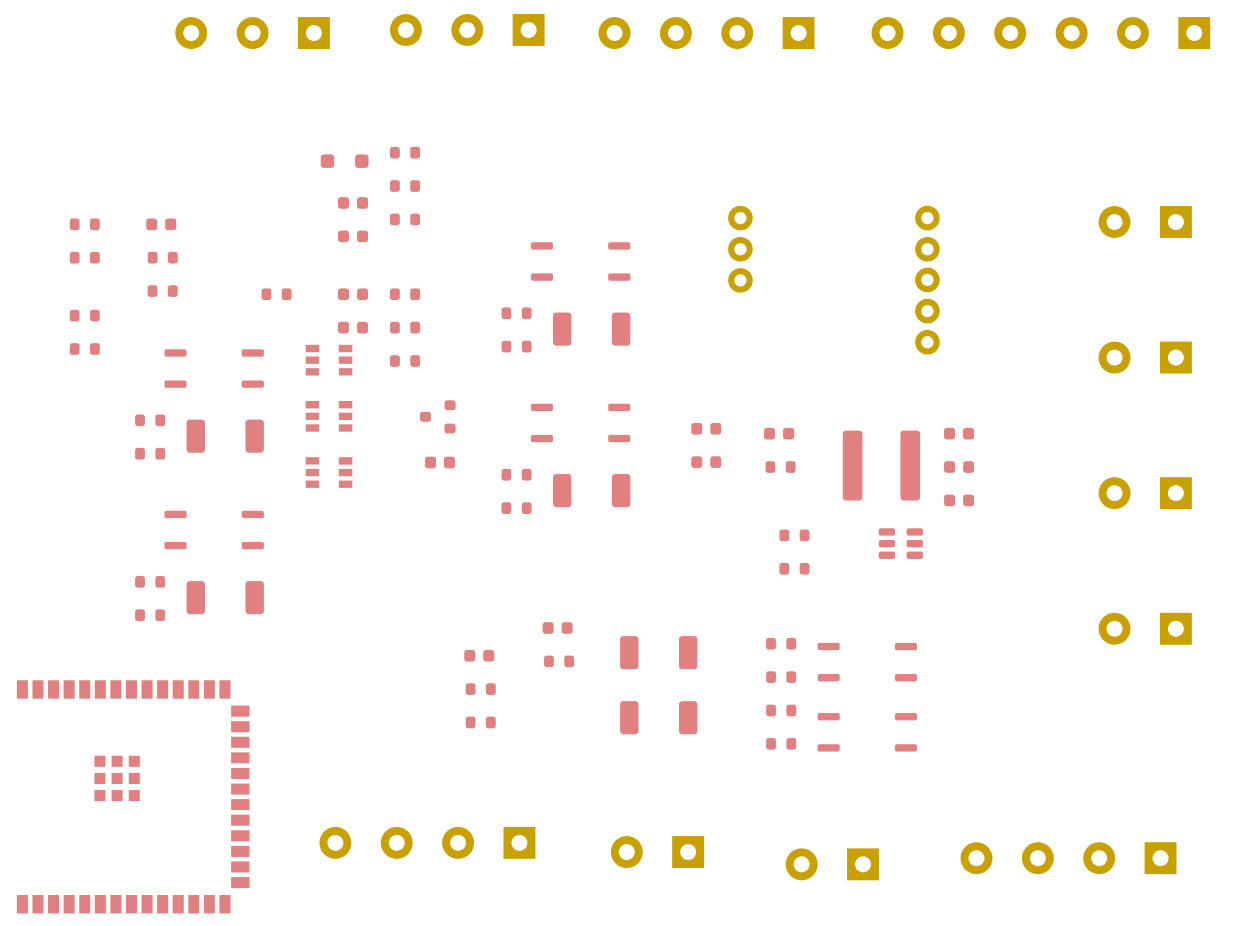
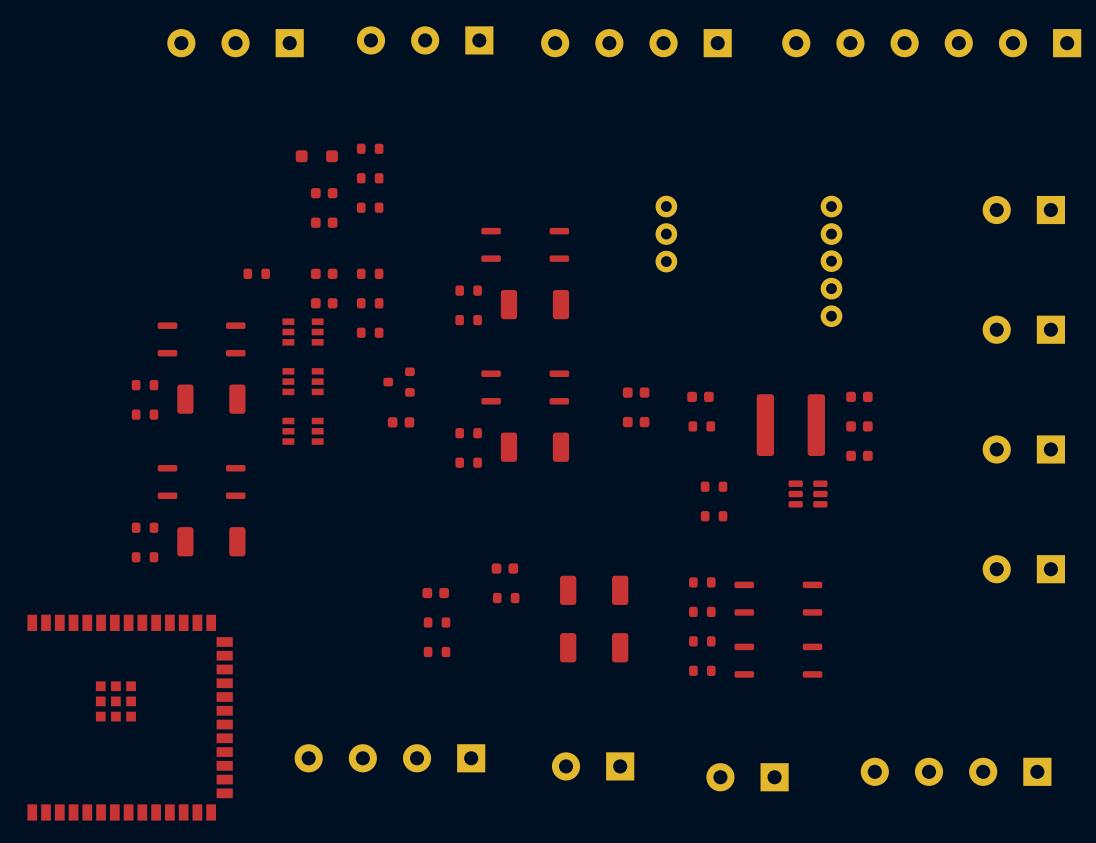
part: (84, 224) -> none
part: (161, 224) -> none
part: (84, 257) -> none
part: (162, 257) -> none
part: (162, 291) -> none
part: (84, 315) -> none
part: (84, 348) -> none

